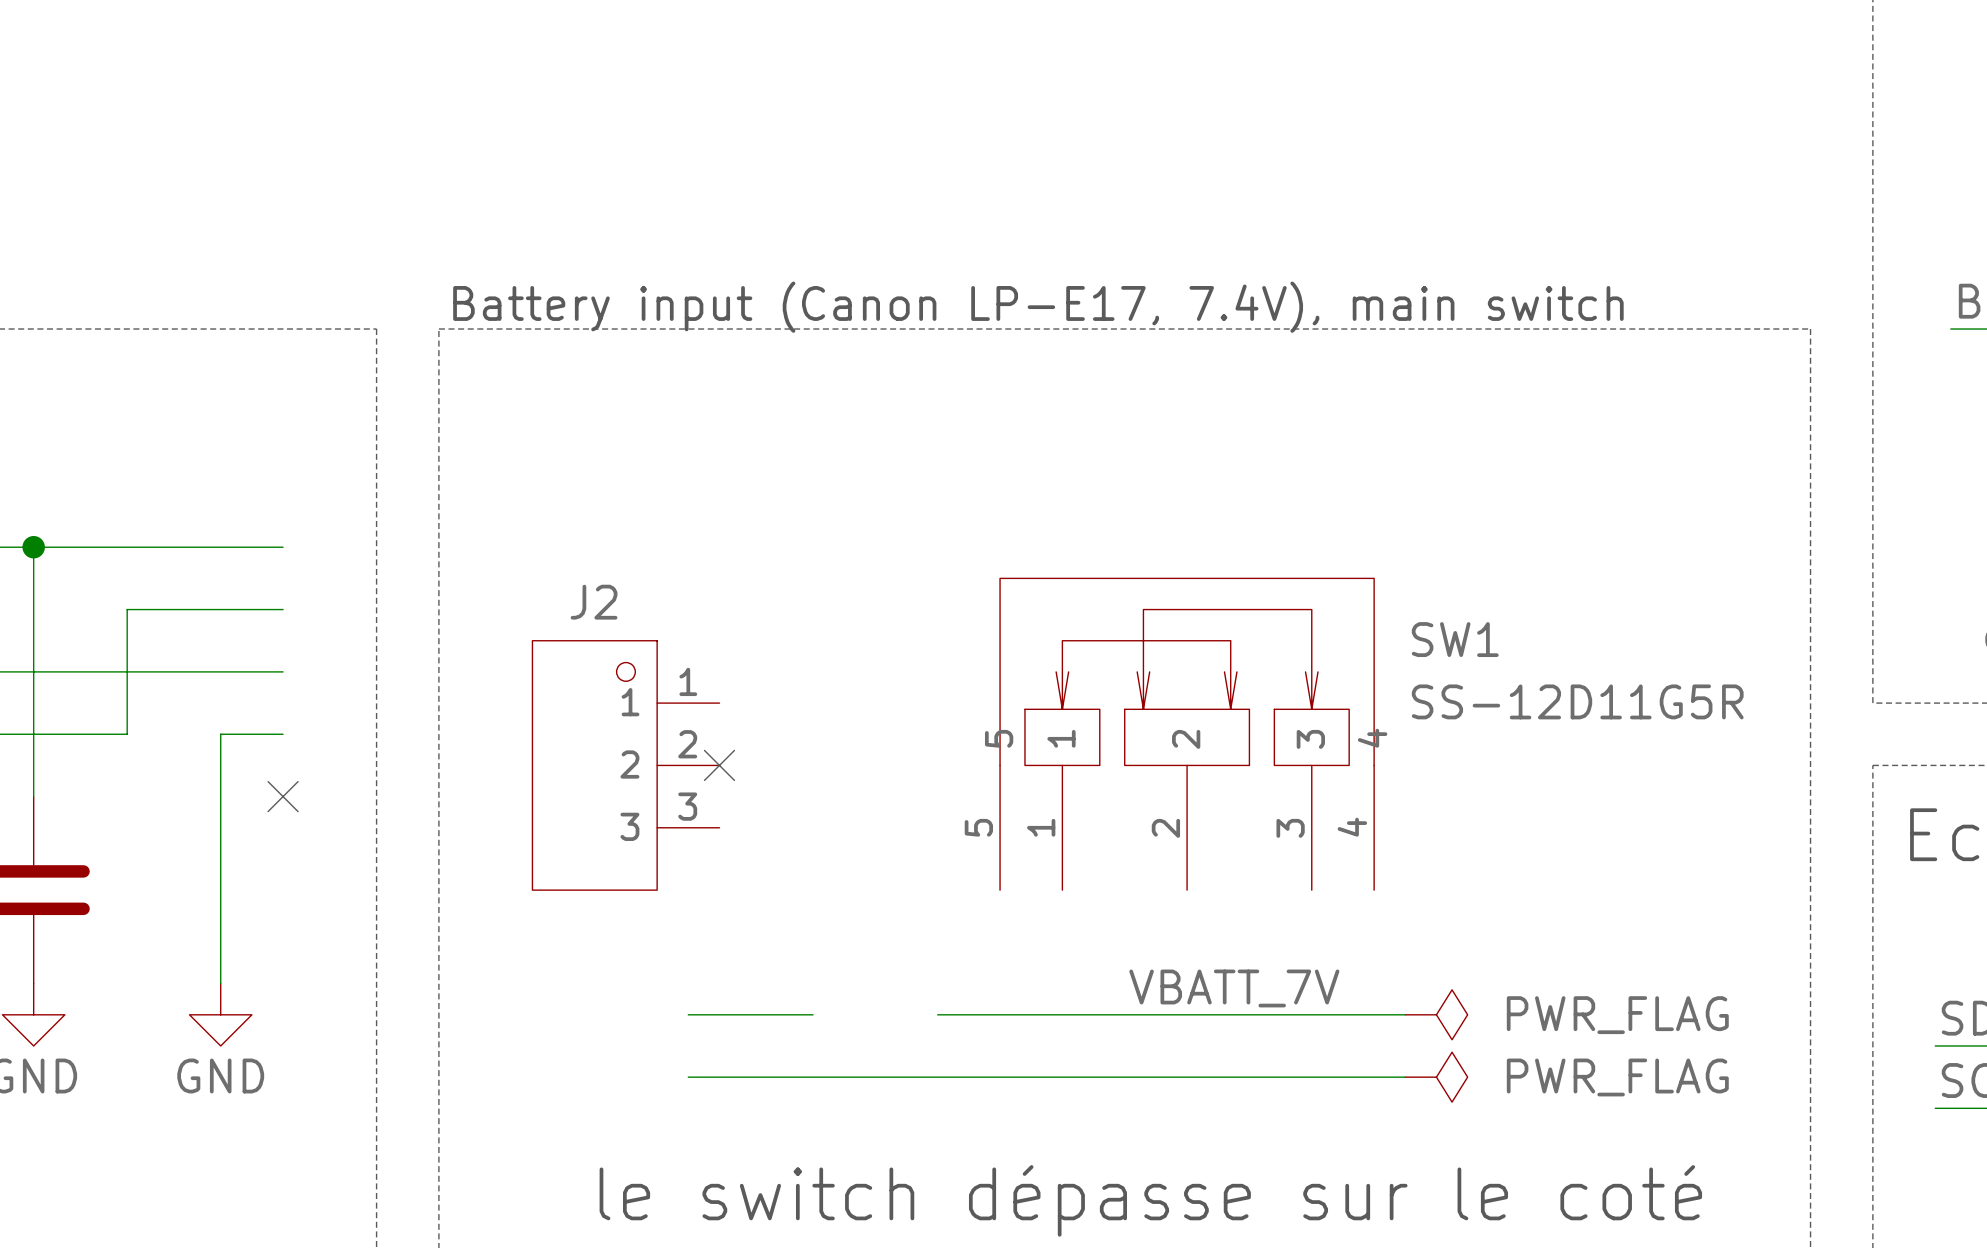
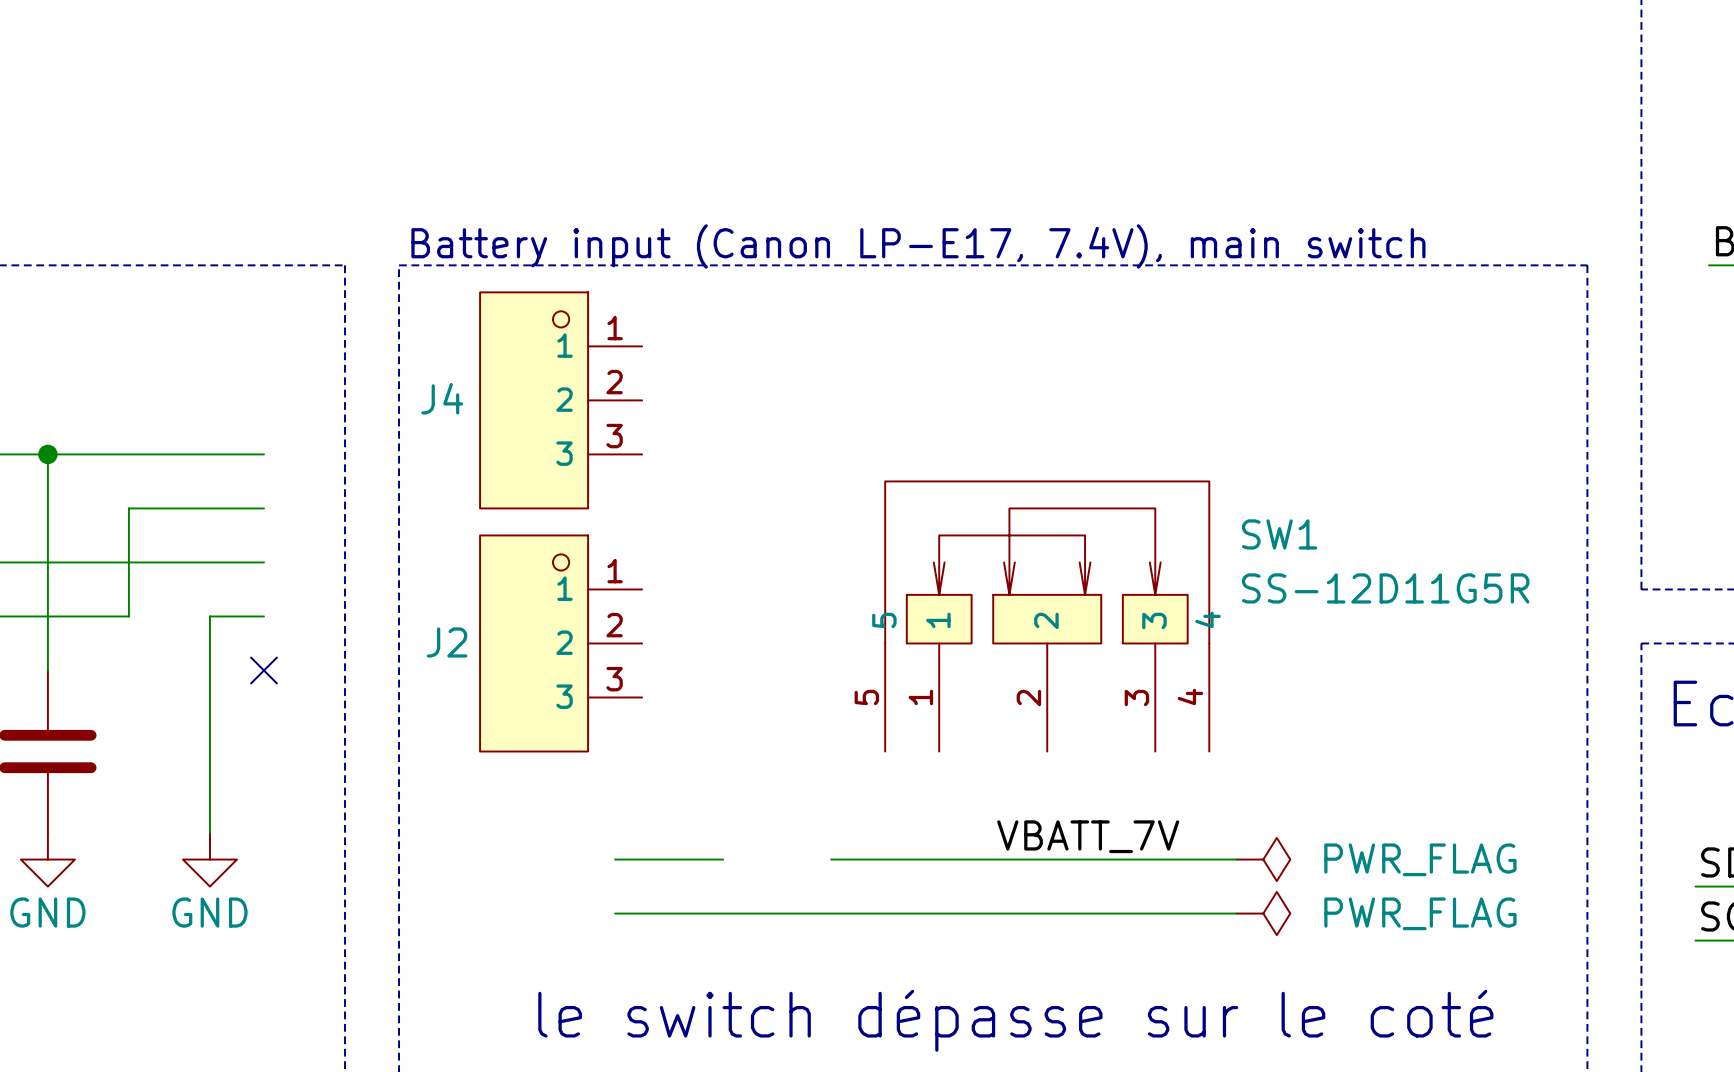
J4: none -> (561, 400)
J2 name position: J2 (594, 602) -> J2 (447, 642)
no-connect mark: (719, 765) -> none

